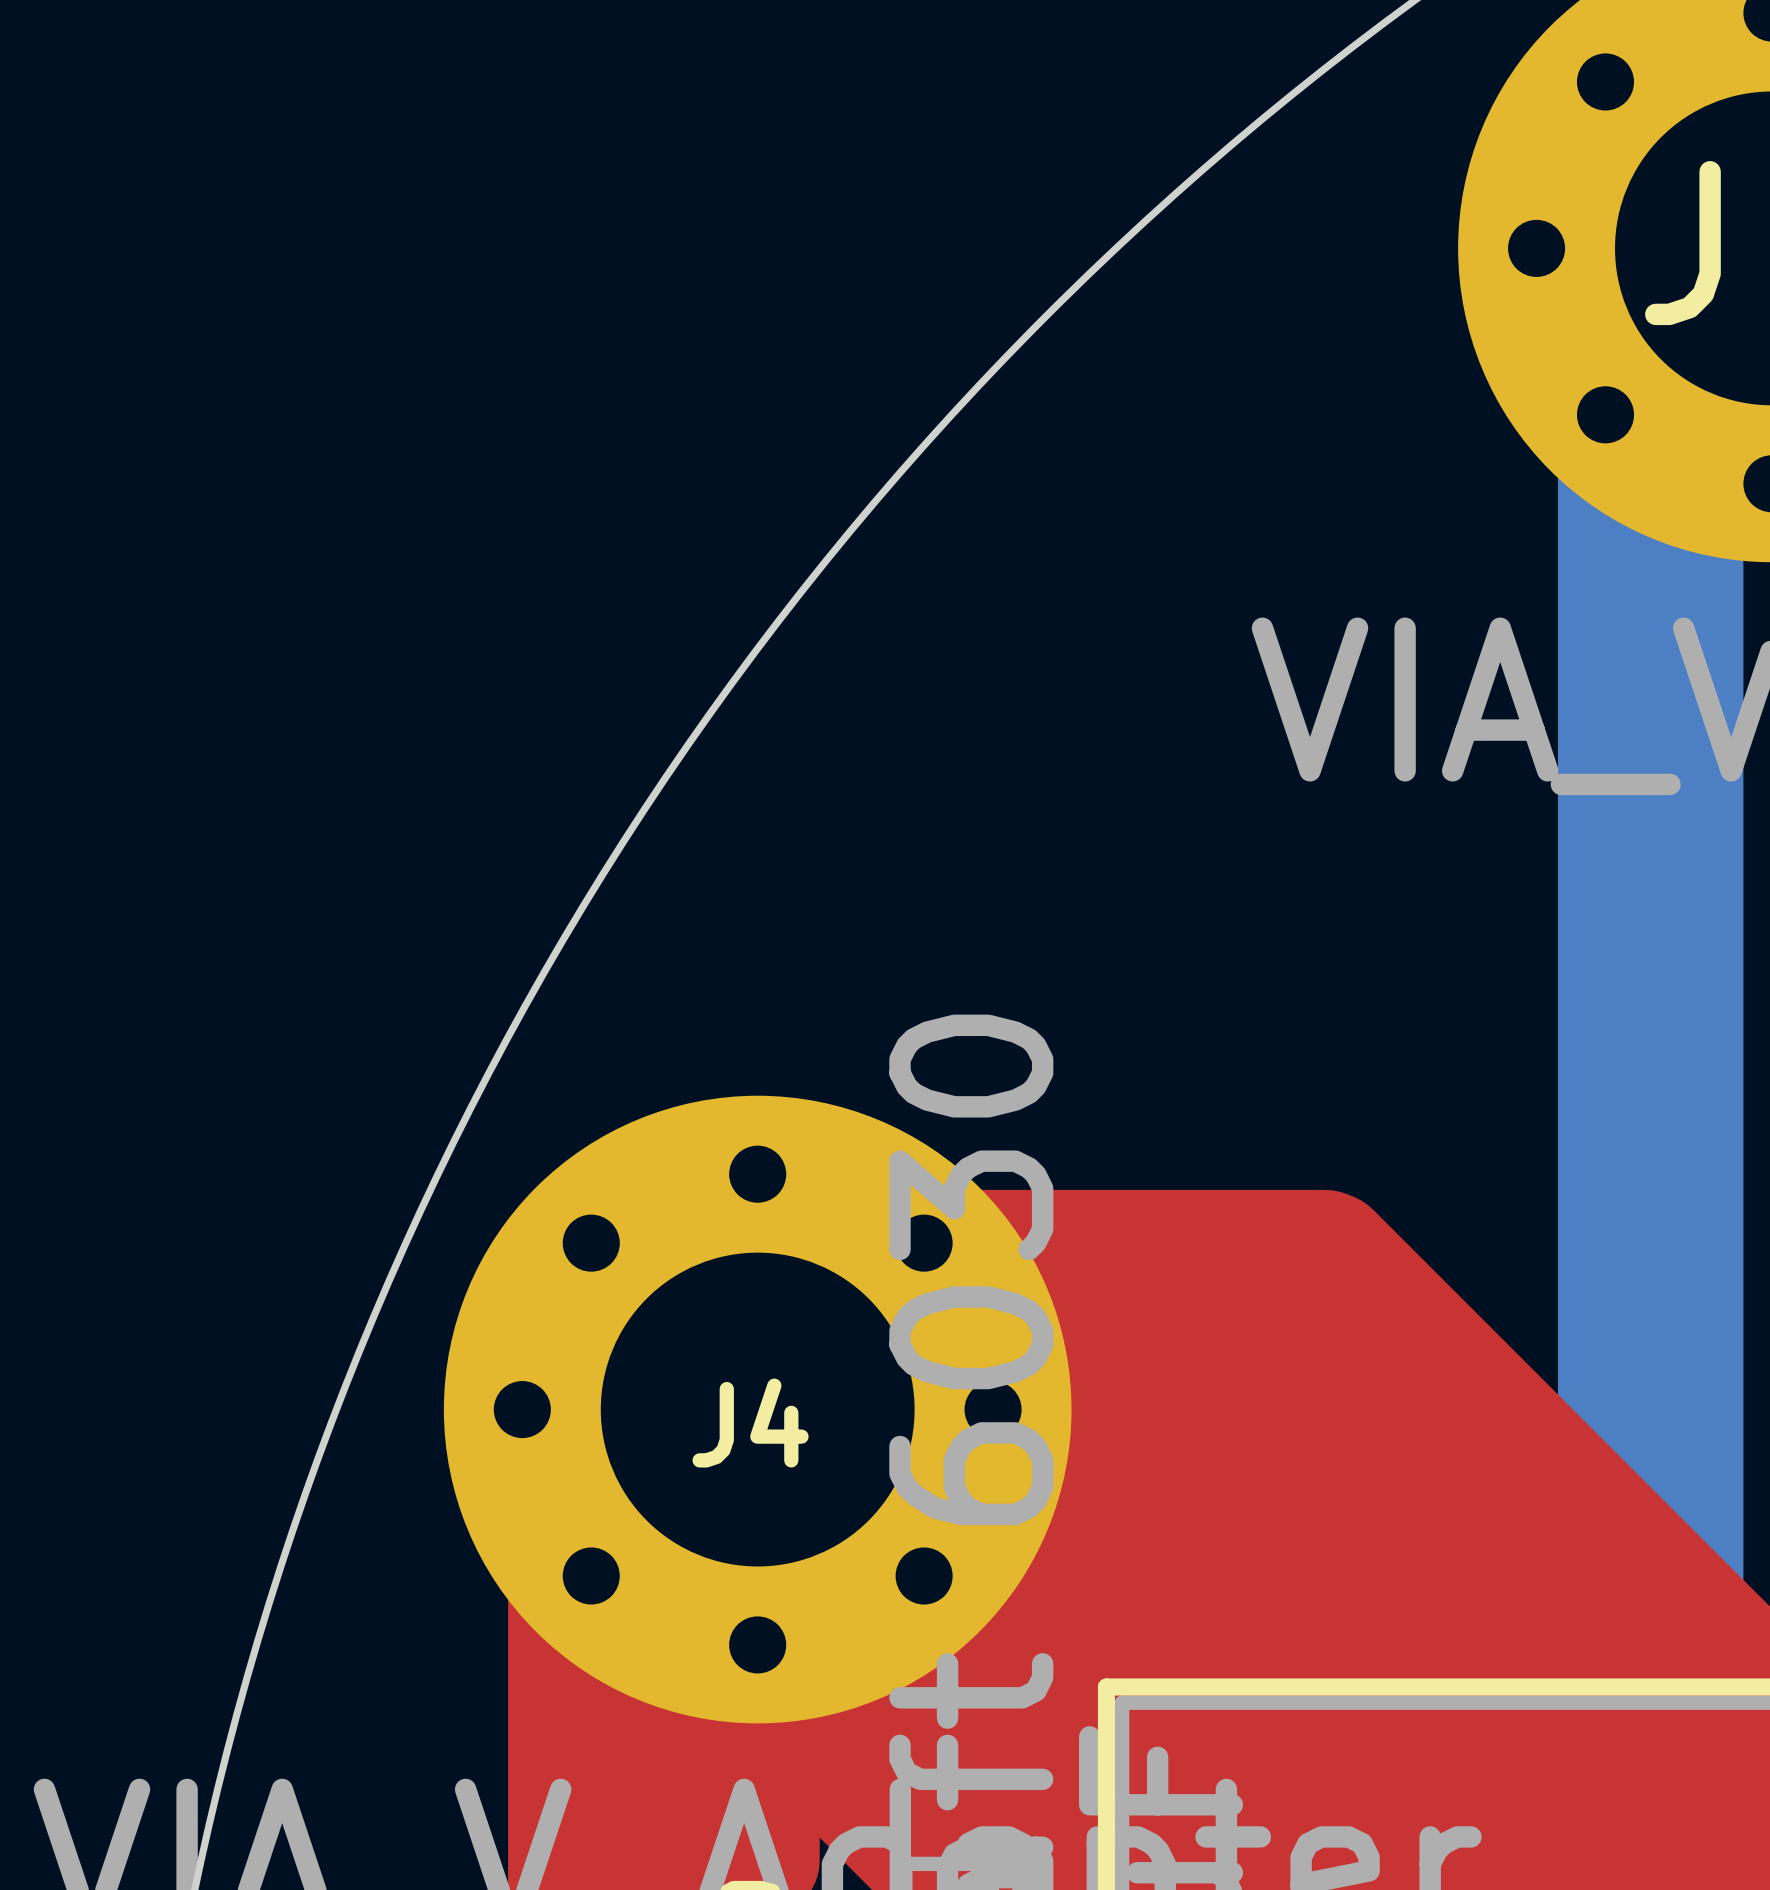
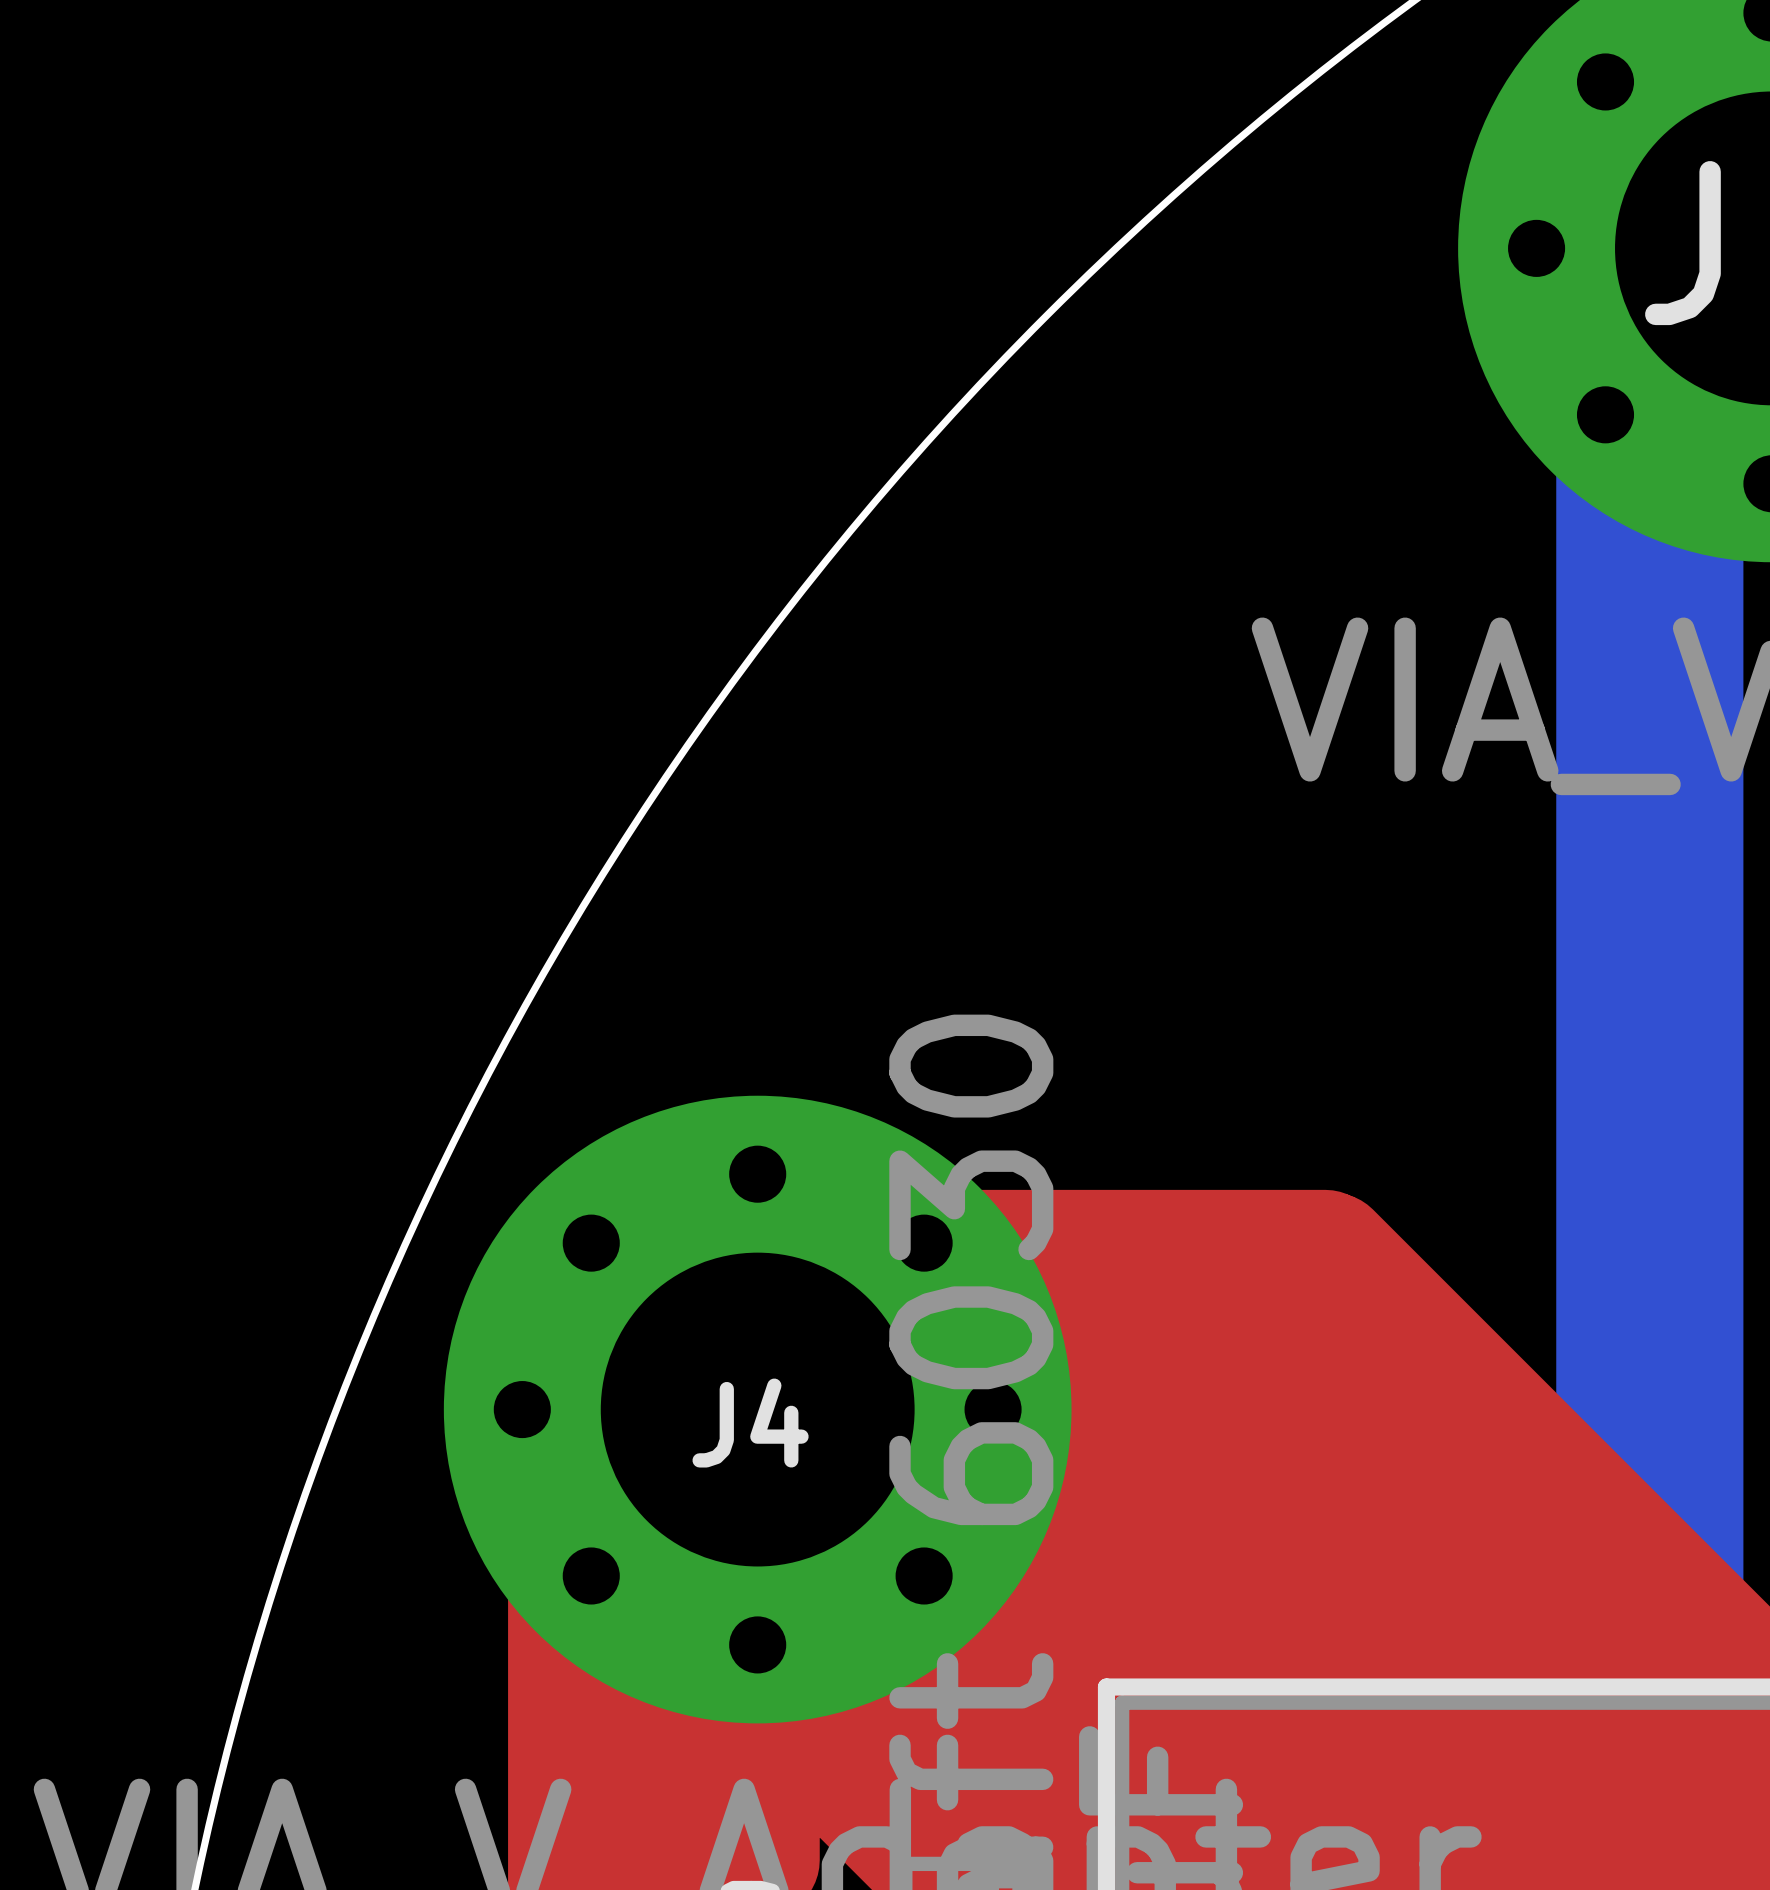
bottom track: (1615, 162) (1615, 1780) -> (1613, 181) (1613, 1798)

